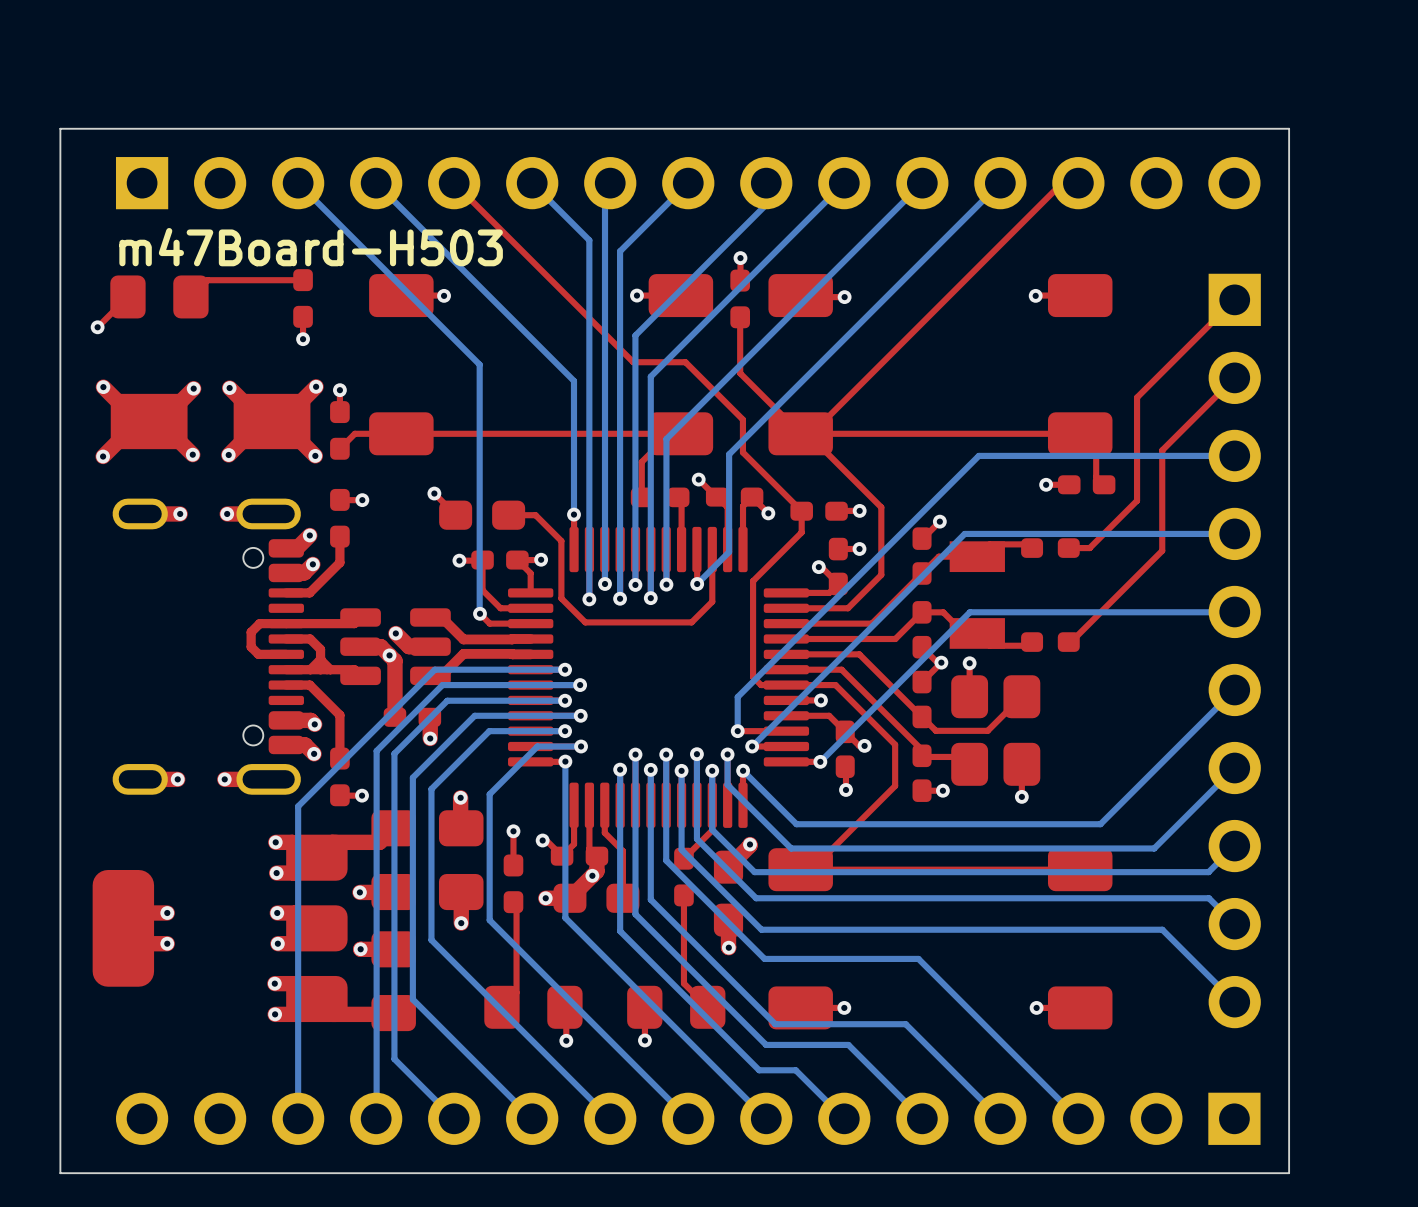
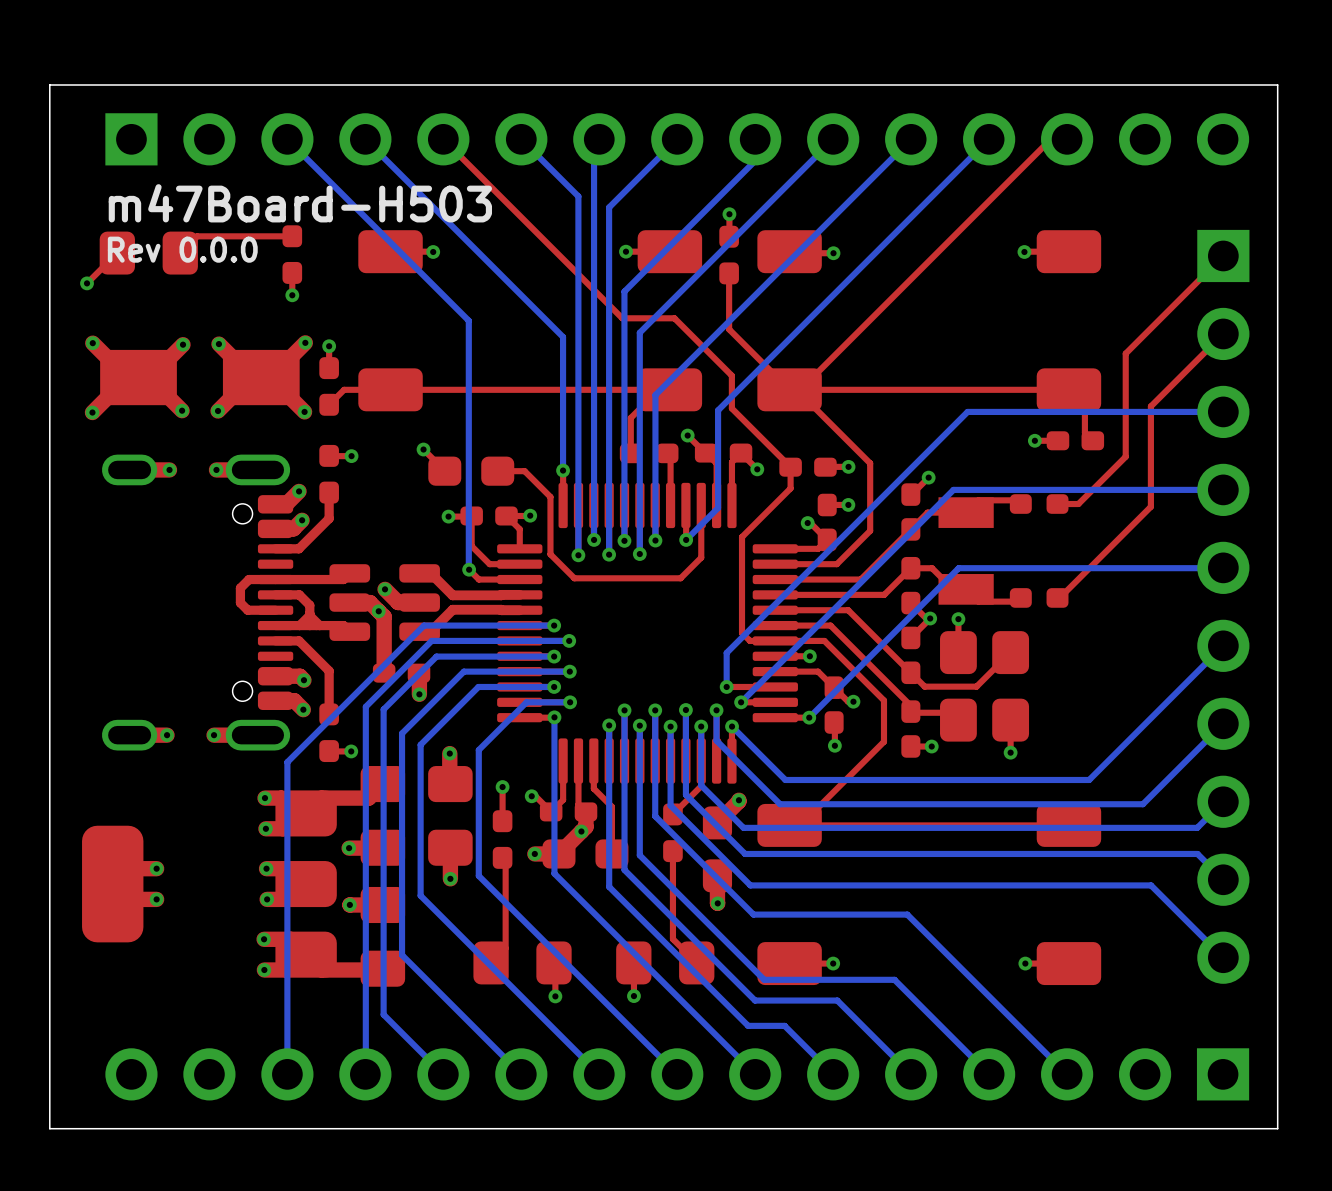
text: none -> Rev 0.0.0 (182, 249)

